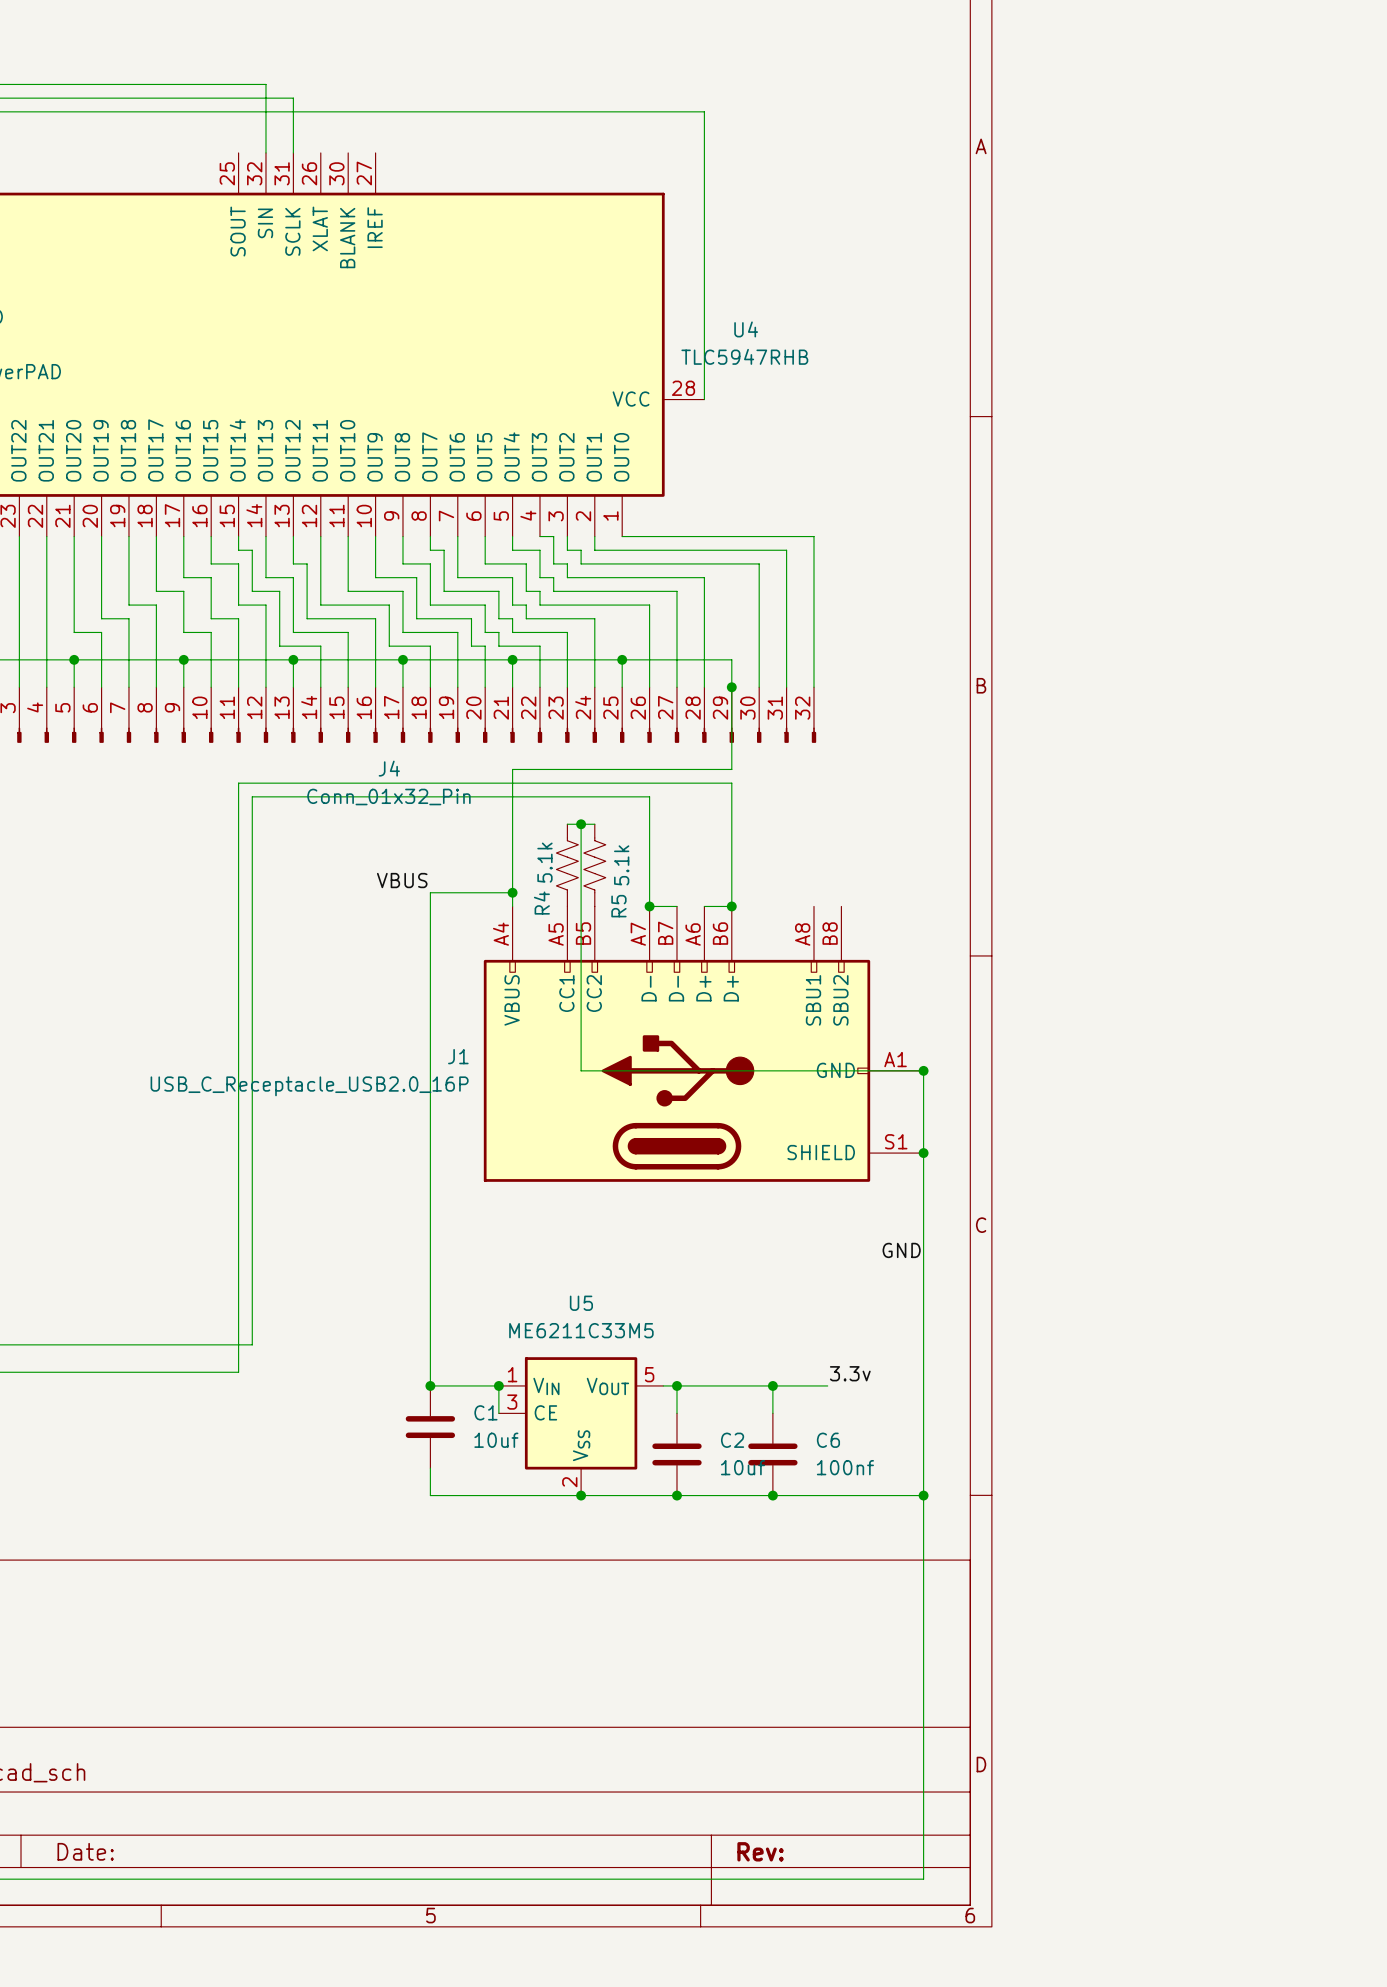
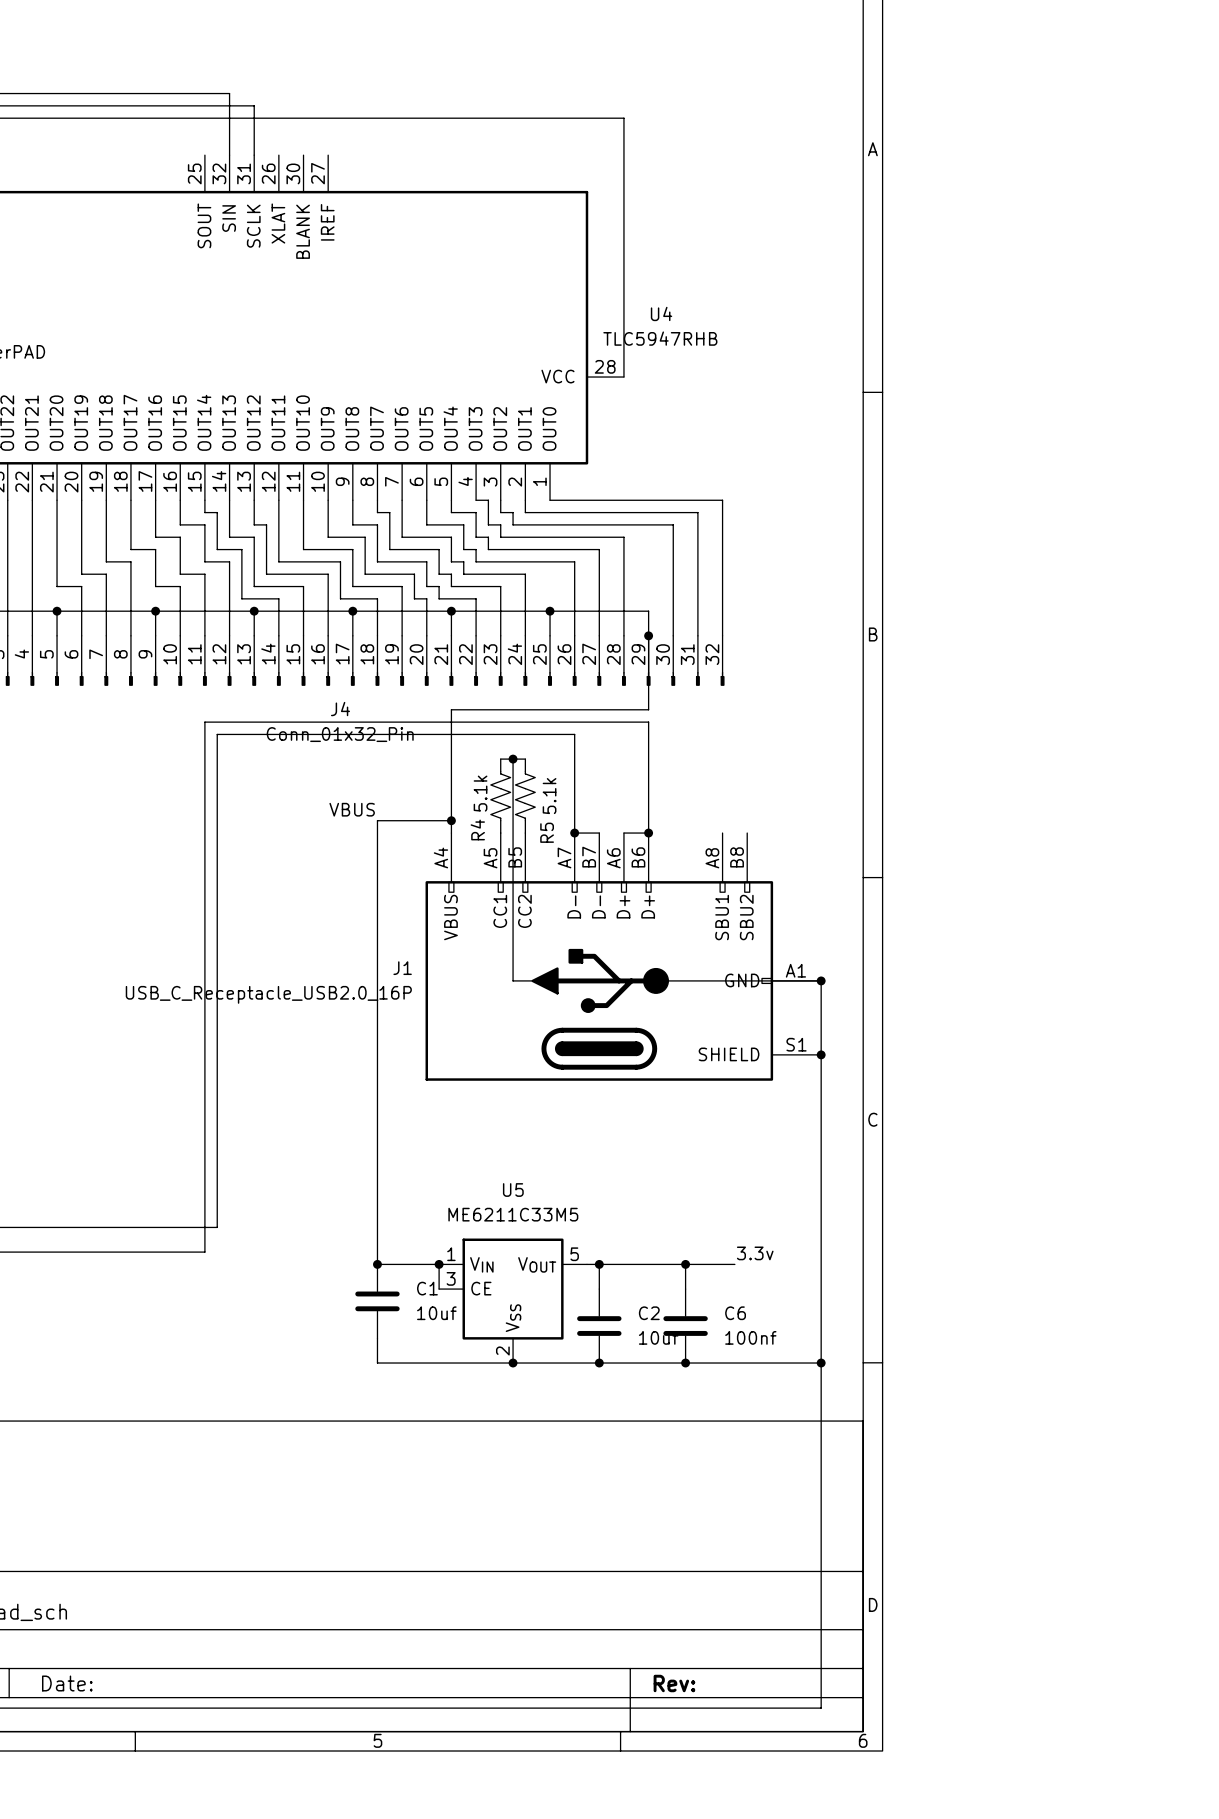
label: GND (901, 1250) -> none

